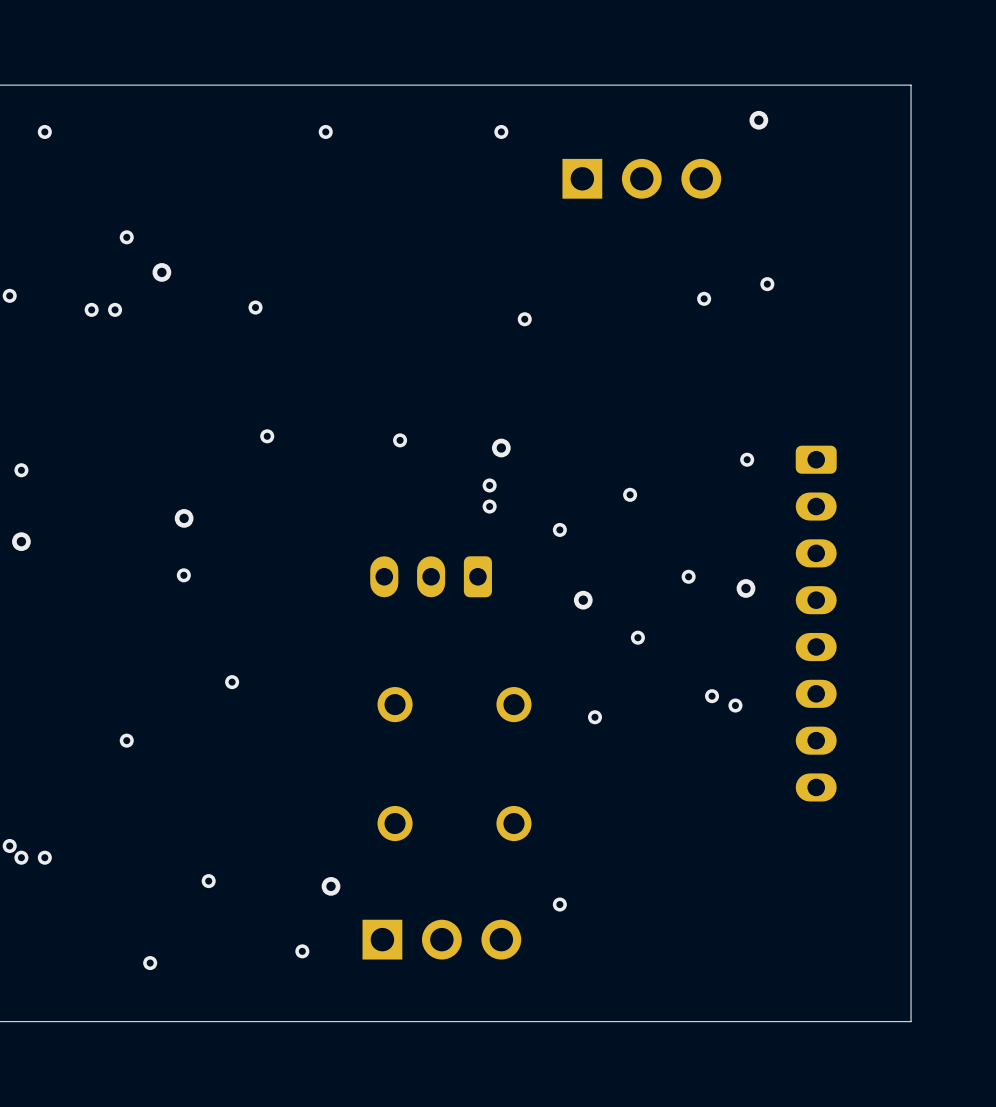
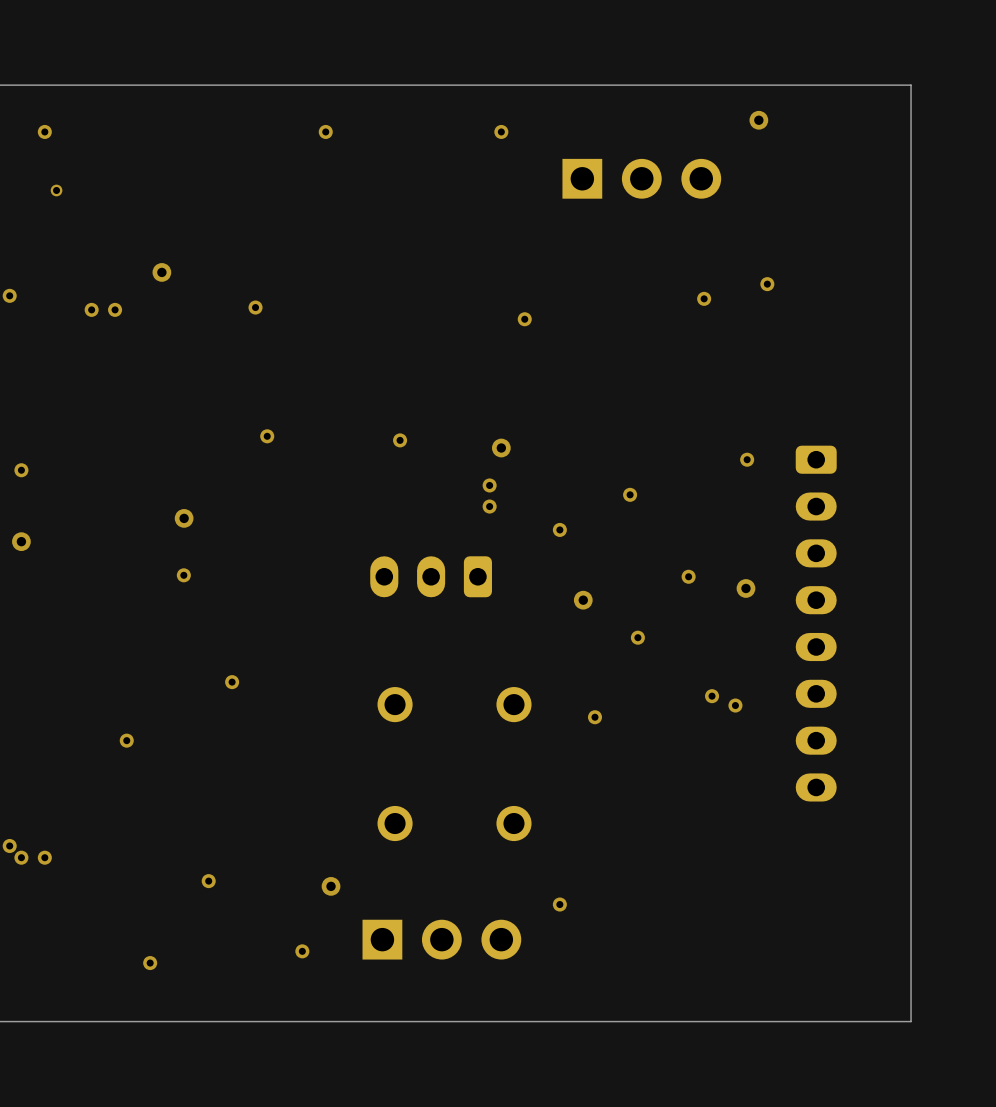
via: none -> (56, 190)
via: (126, 237) -> none

